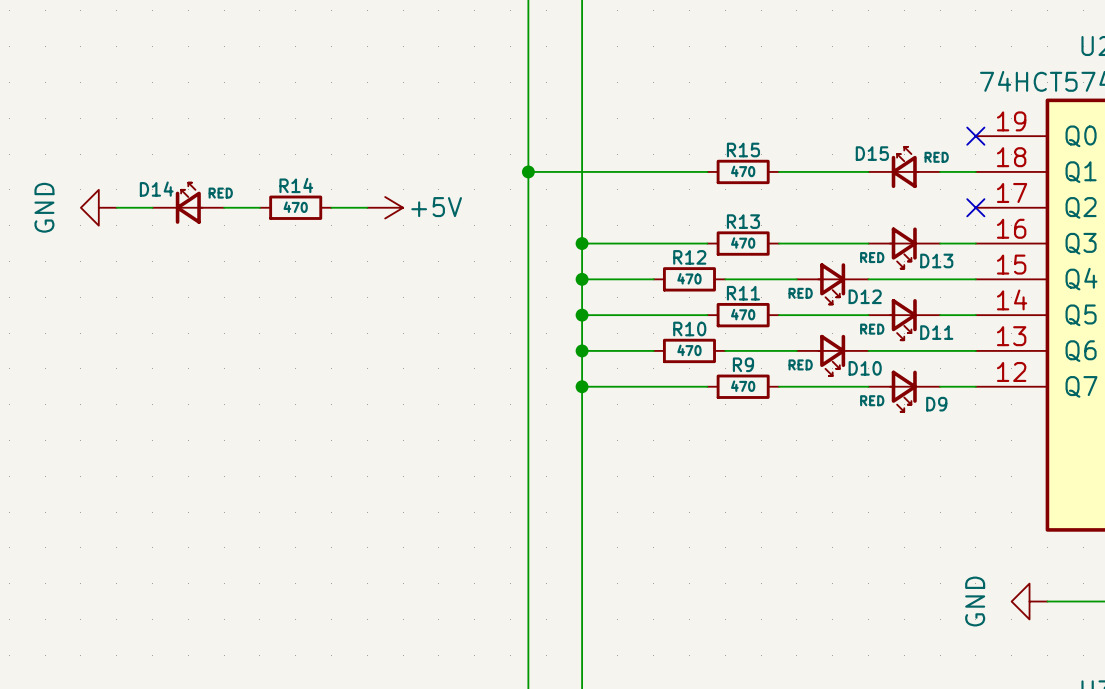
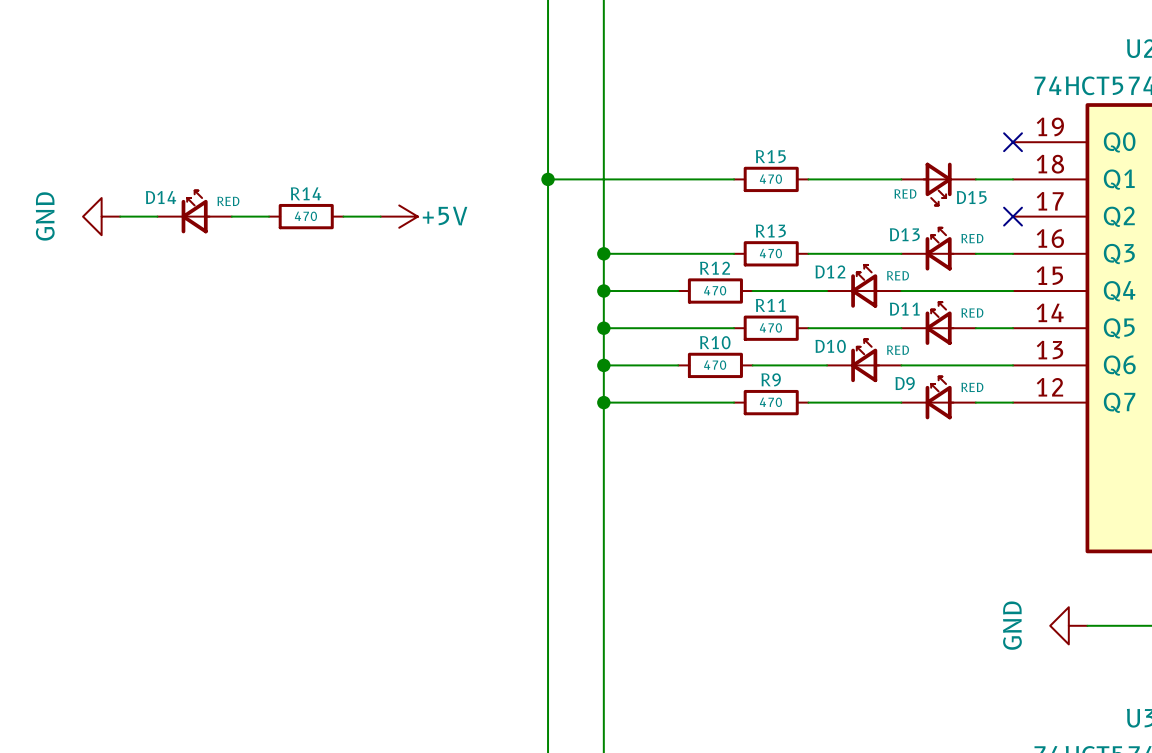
D15 rotation: 0° (905, 167) -> 180° (937, 184)
D13 rotation: 0° (903, 248) -> 180° (939, 249)
D12 rotation: 0° (831, 283) -> 180° (865, 286)
D11 rotation: 0° (903, 319) -> 180° (939, 323)
D10 rotation: 0° (831, 355) -> 180° (865, 360)
D9 rotation: 0° (903, 391) -> 180° (939, 397)

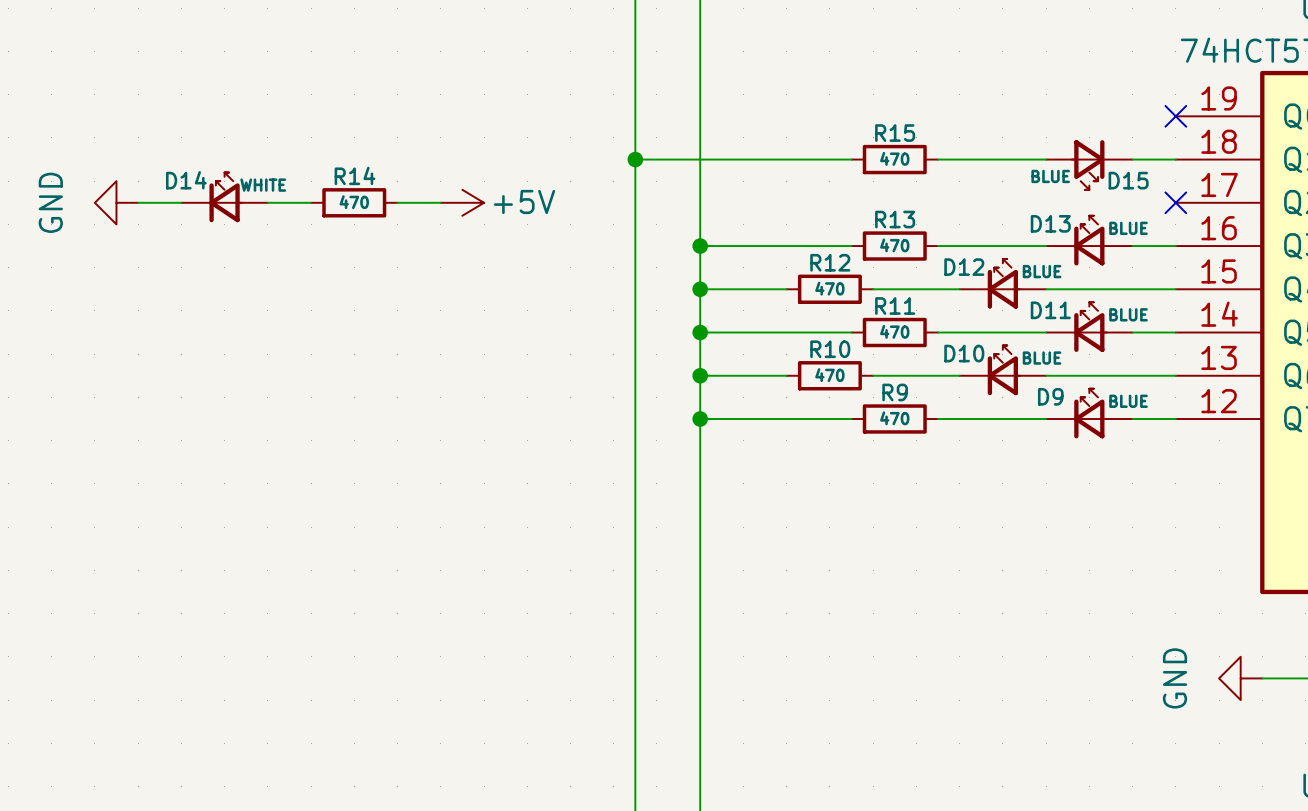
D15 value: RED (905, 193) -> BLUE (1050, 176)
D14 value: RED (228, 201) -> WHITE (263, 185)
D13 value: RED (972, 238) -> BLUE (1128, 228)
D12 value: RED (898, 275) -> BLUE (1042, 271)
D11 value: RED (972, 313) -> BLUE (1128, 314)
D10 value: RED (898, 350) -> BLUE (1042, 358)
D9 value: RED (972, 387) -> BLUE (1128, 401)

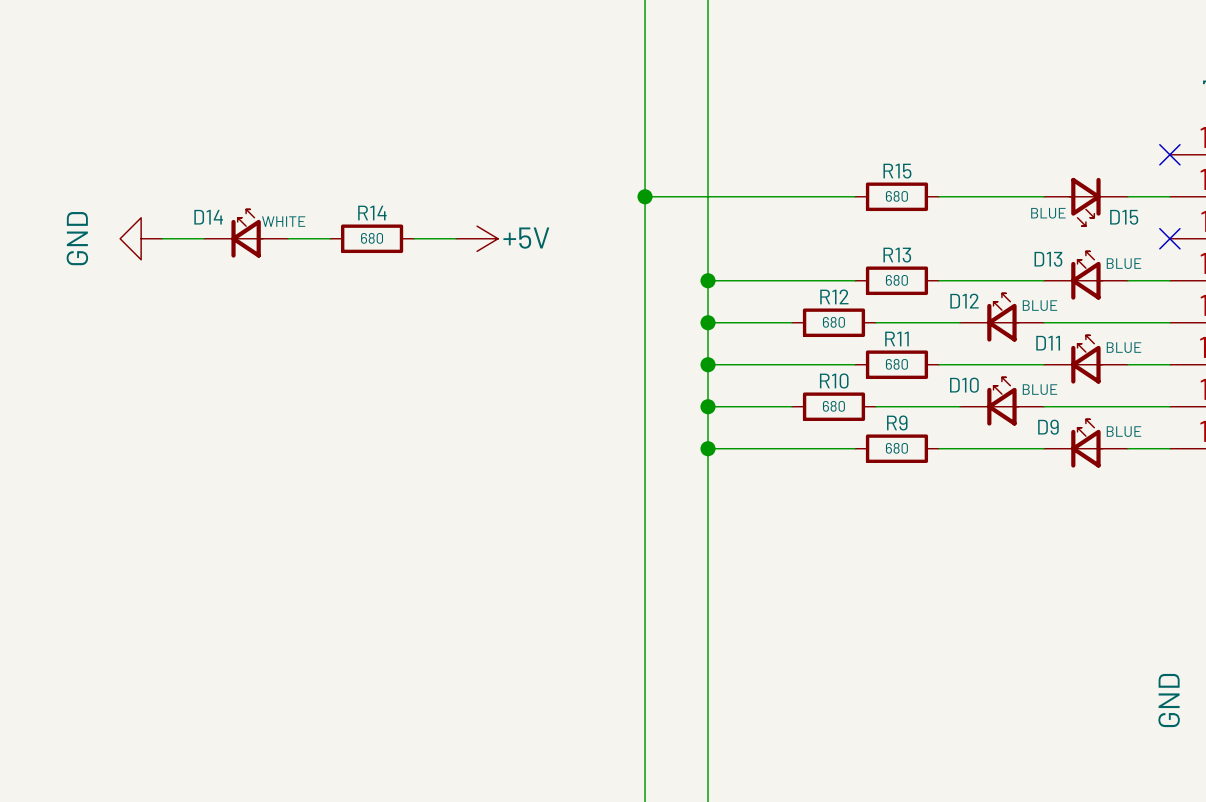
R15 value: 470 (894, 158) -> 680 (896, 196)
R14 value: 470 (354, 202) -> 680 (372, 238)
R13 value: 470 (894, 245) -> 680 (896, 280)
R12 value: 470 (829, 288) -> 680 (833, 322)
R11 value: 470 (894, 331) -> 680 (896, 364)
R10 value: 470 (829, 375) -> 680 (833, 406)
R9 value: 470 (894, 418) -> 680 (896, 448)

